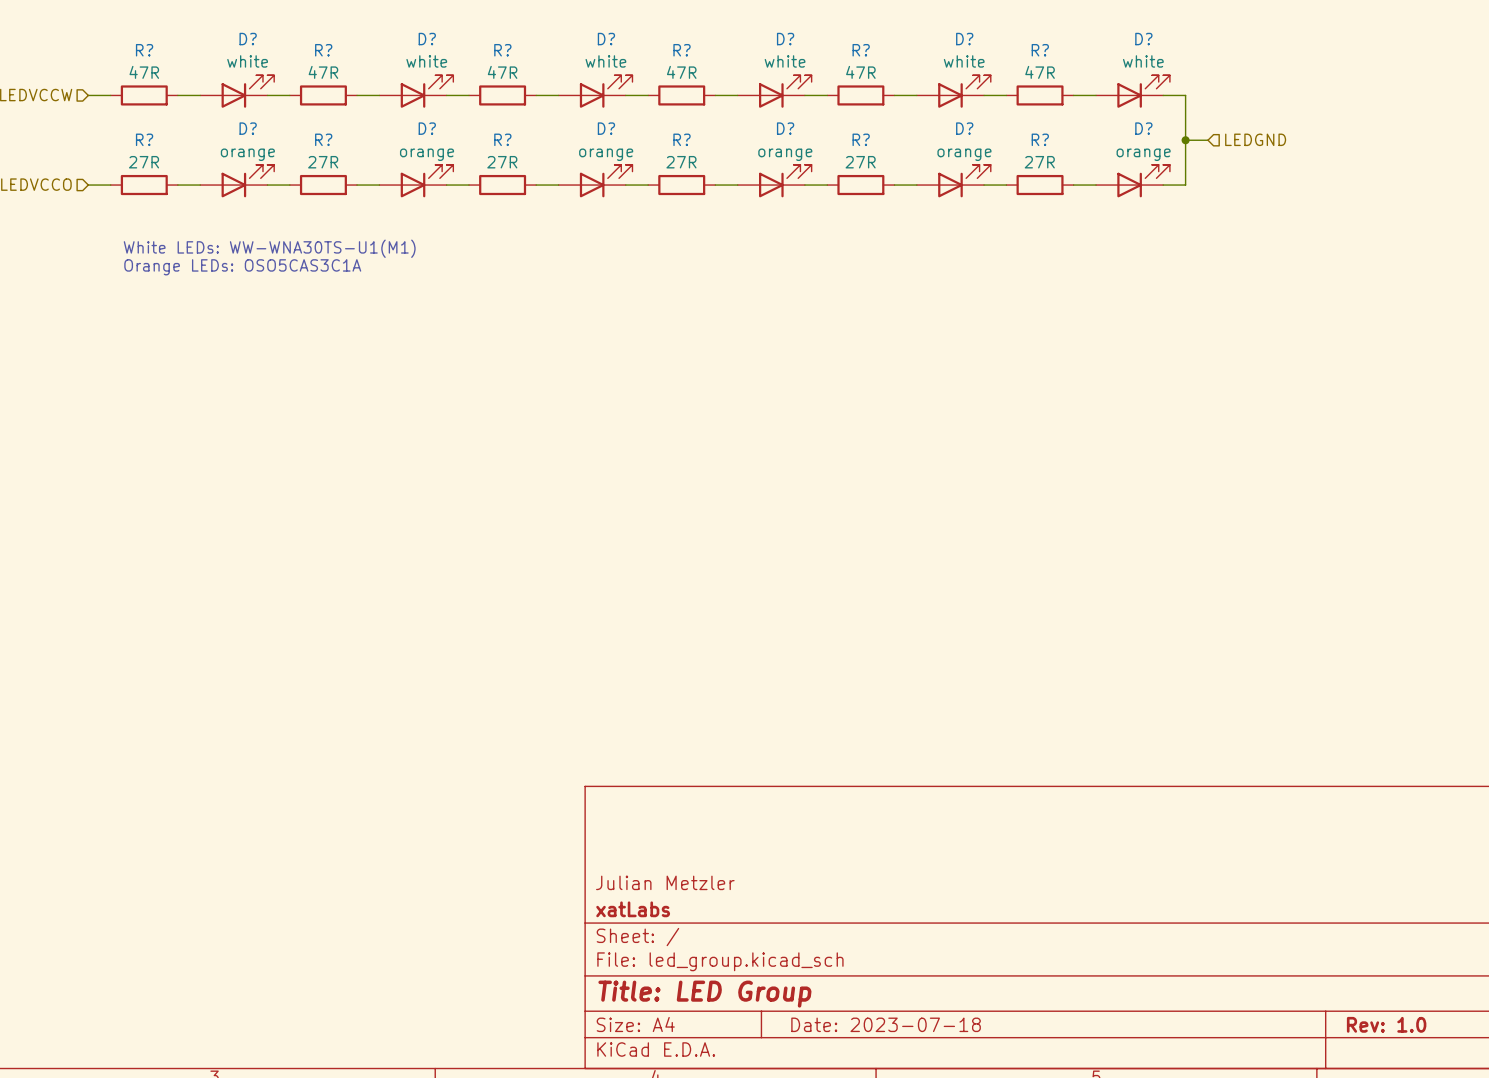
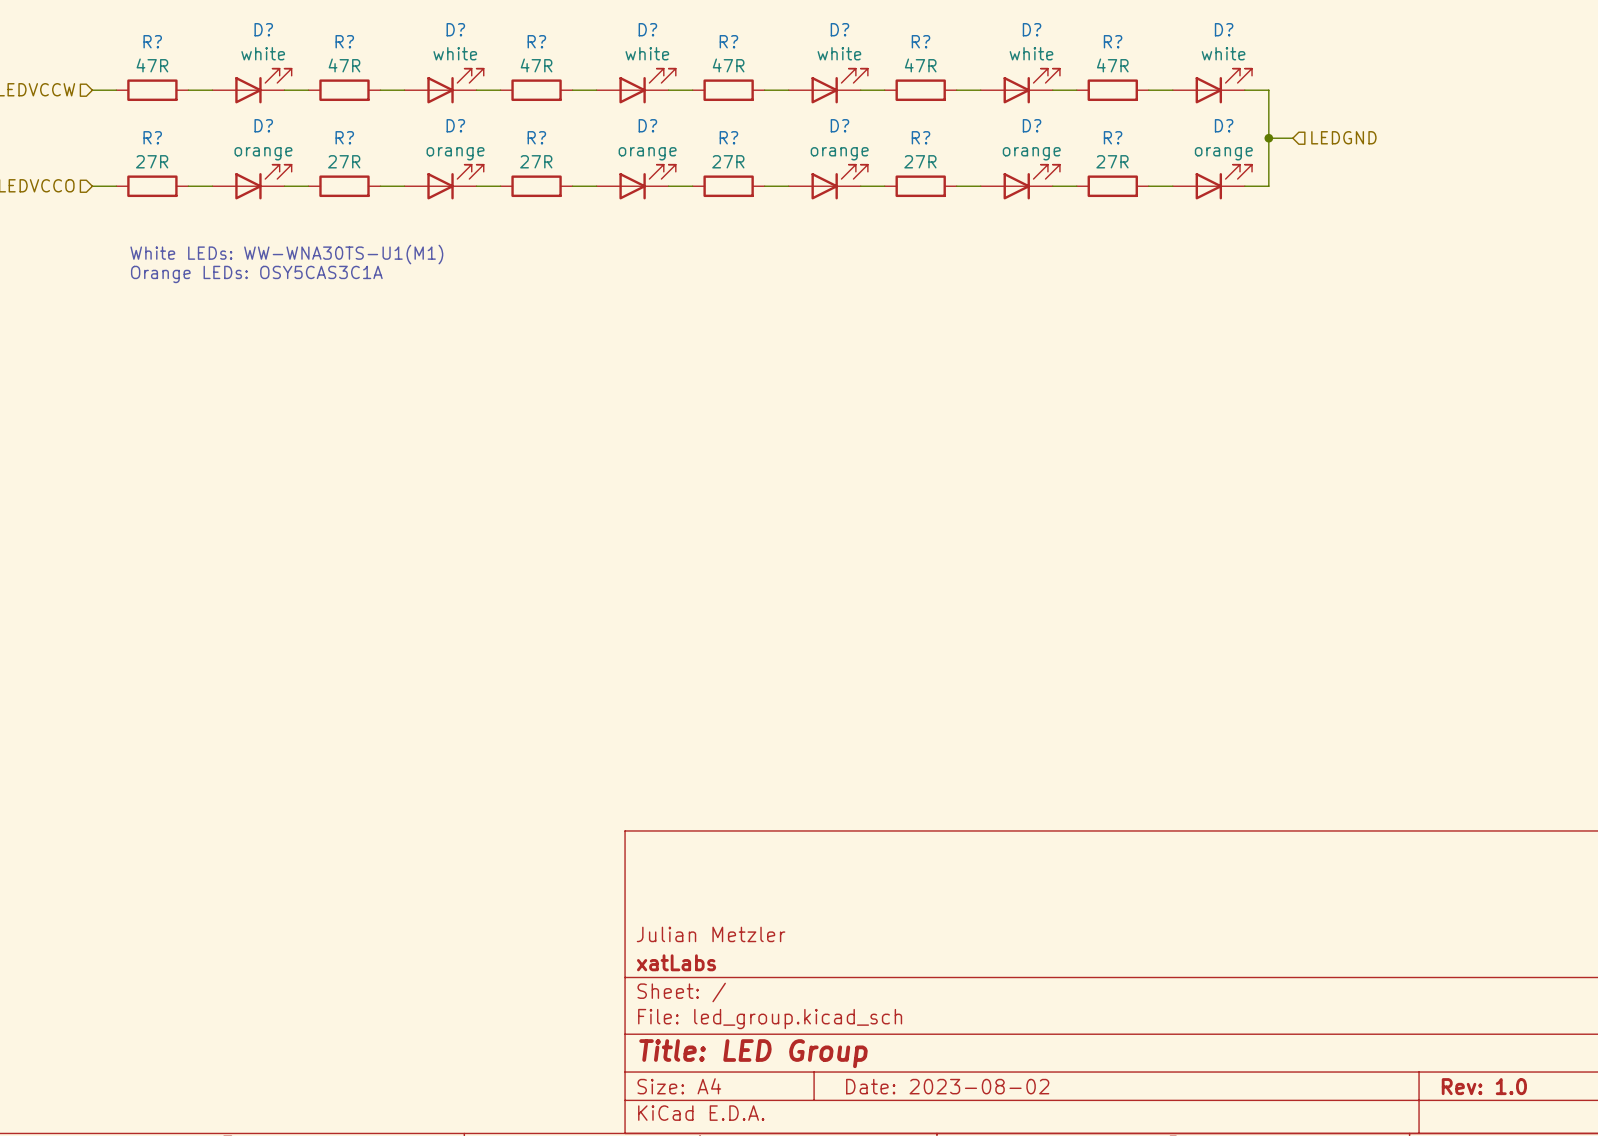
text: Orange LEDs: OSO5CAS3C1A (242, 267) -> Orange LEDs: OSY5CAS3C1A (256, 274)
title block: Date: 2023-07-18 (886, 1024) -> Date: 2023-08-02 (947, 1086)

